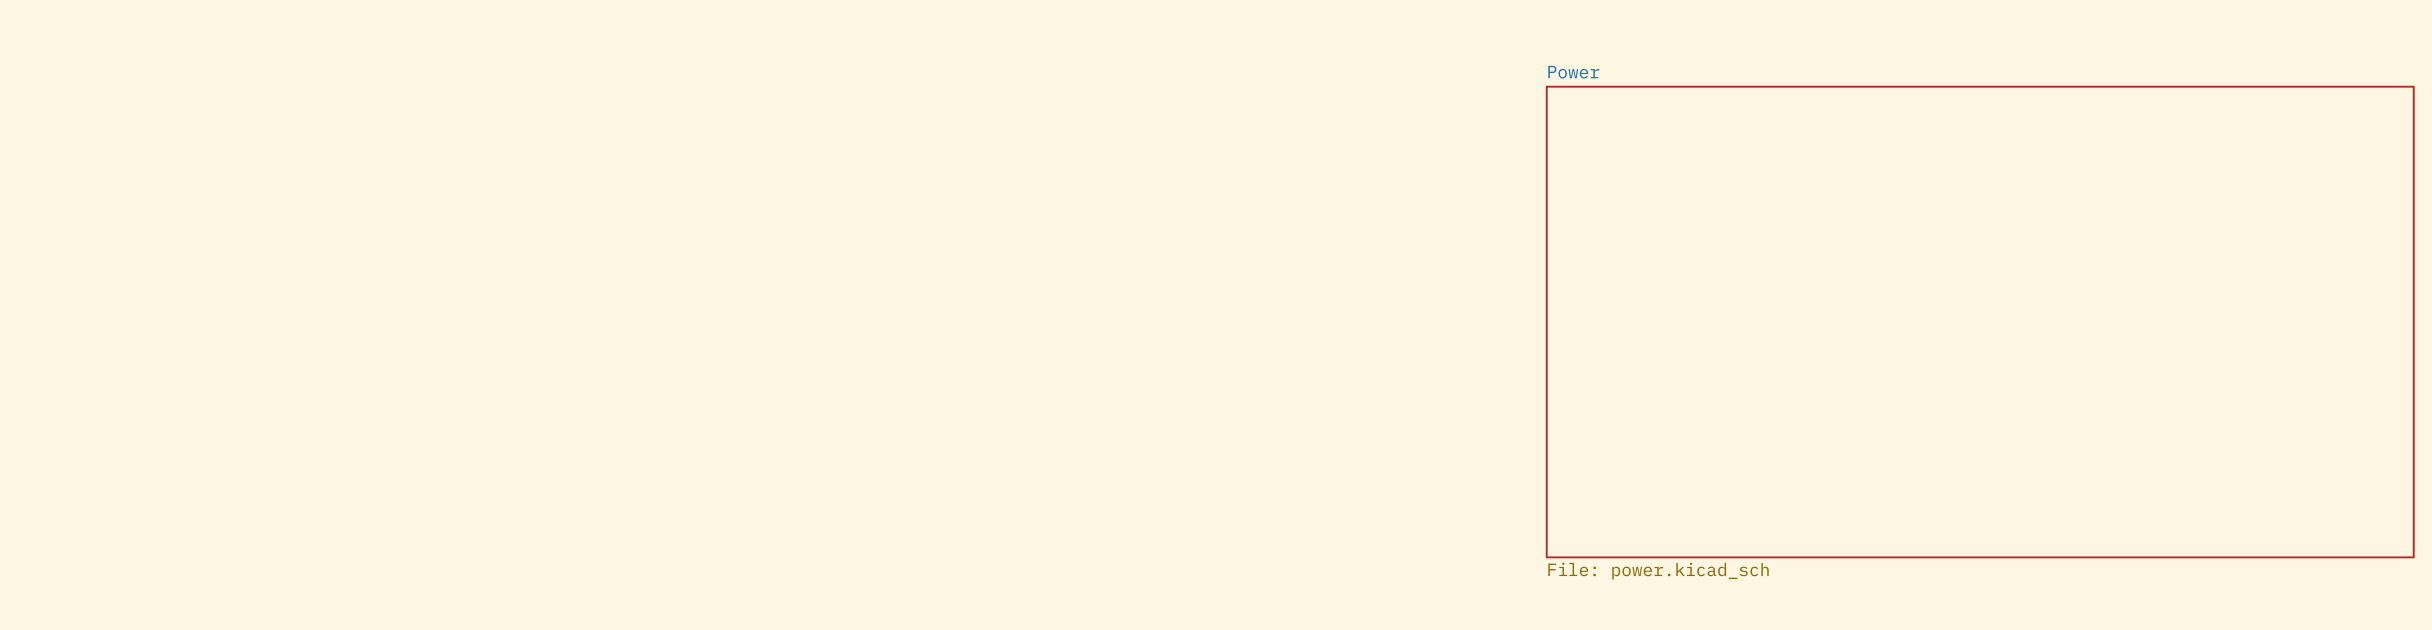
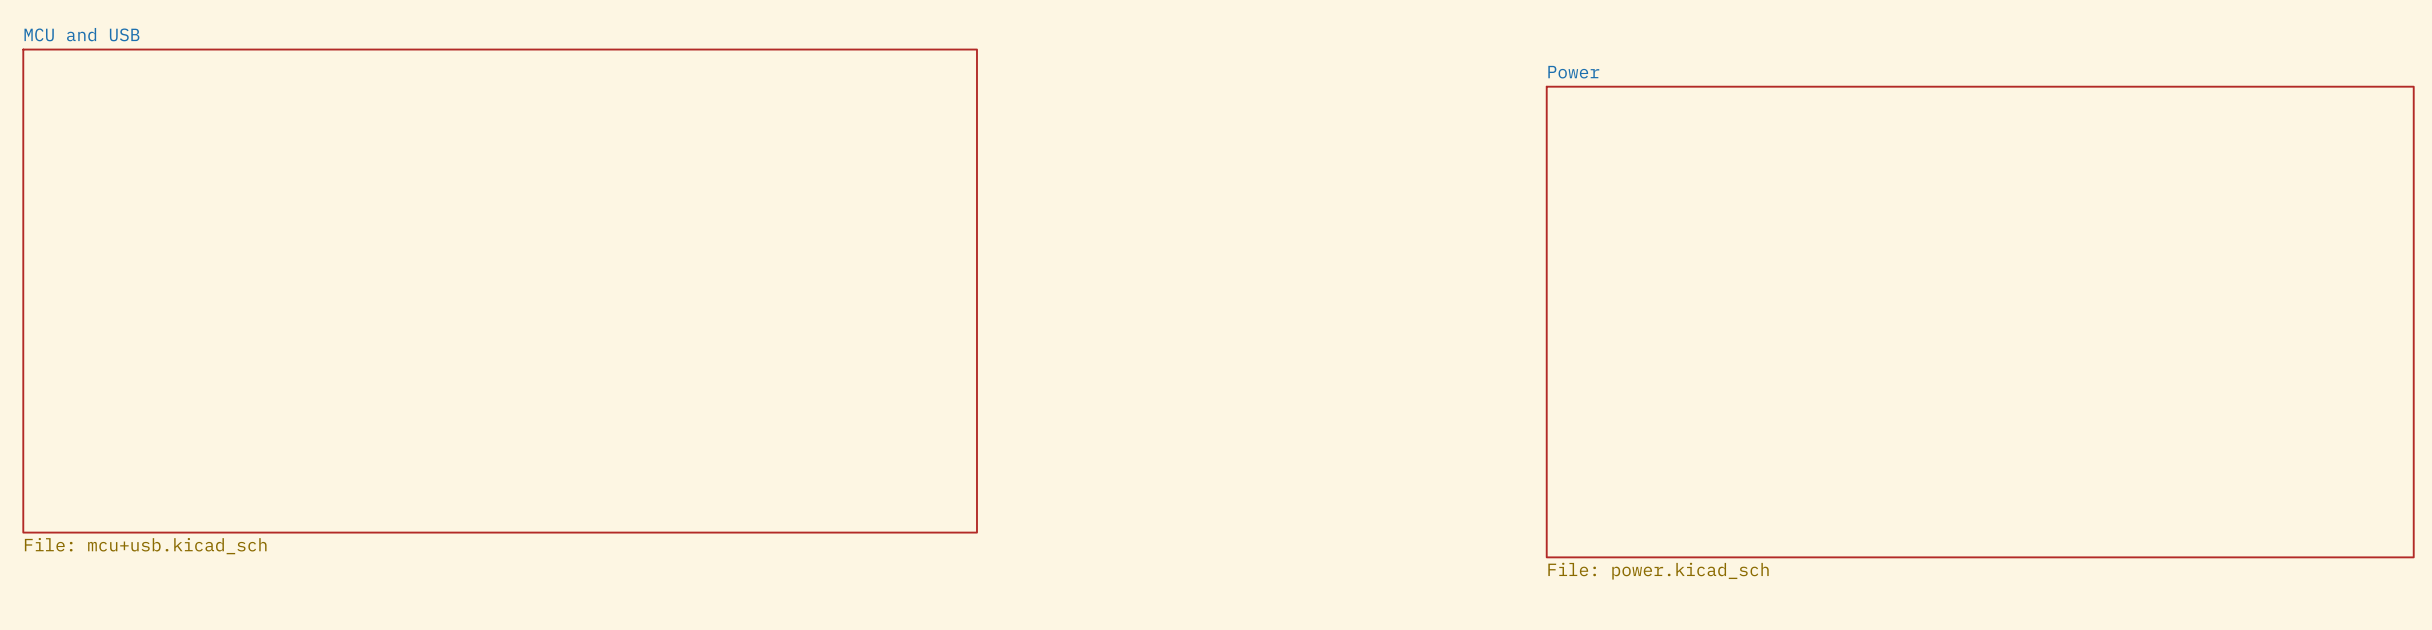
sheet MCU and USB: none -> File: mcu+usb.kicad_sch (500, 291)

